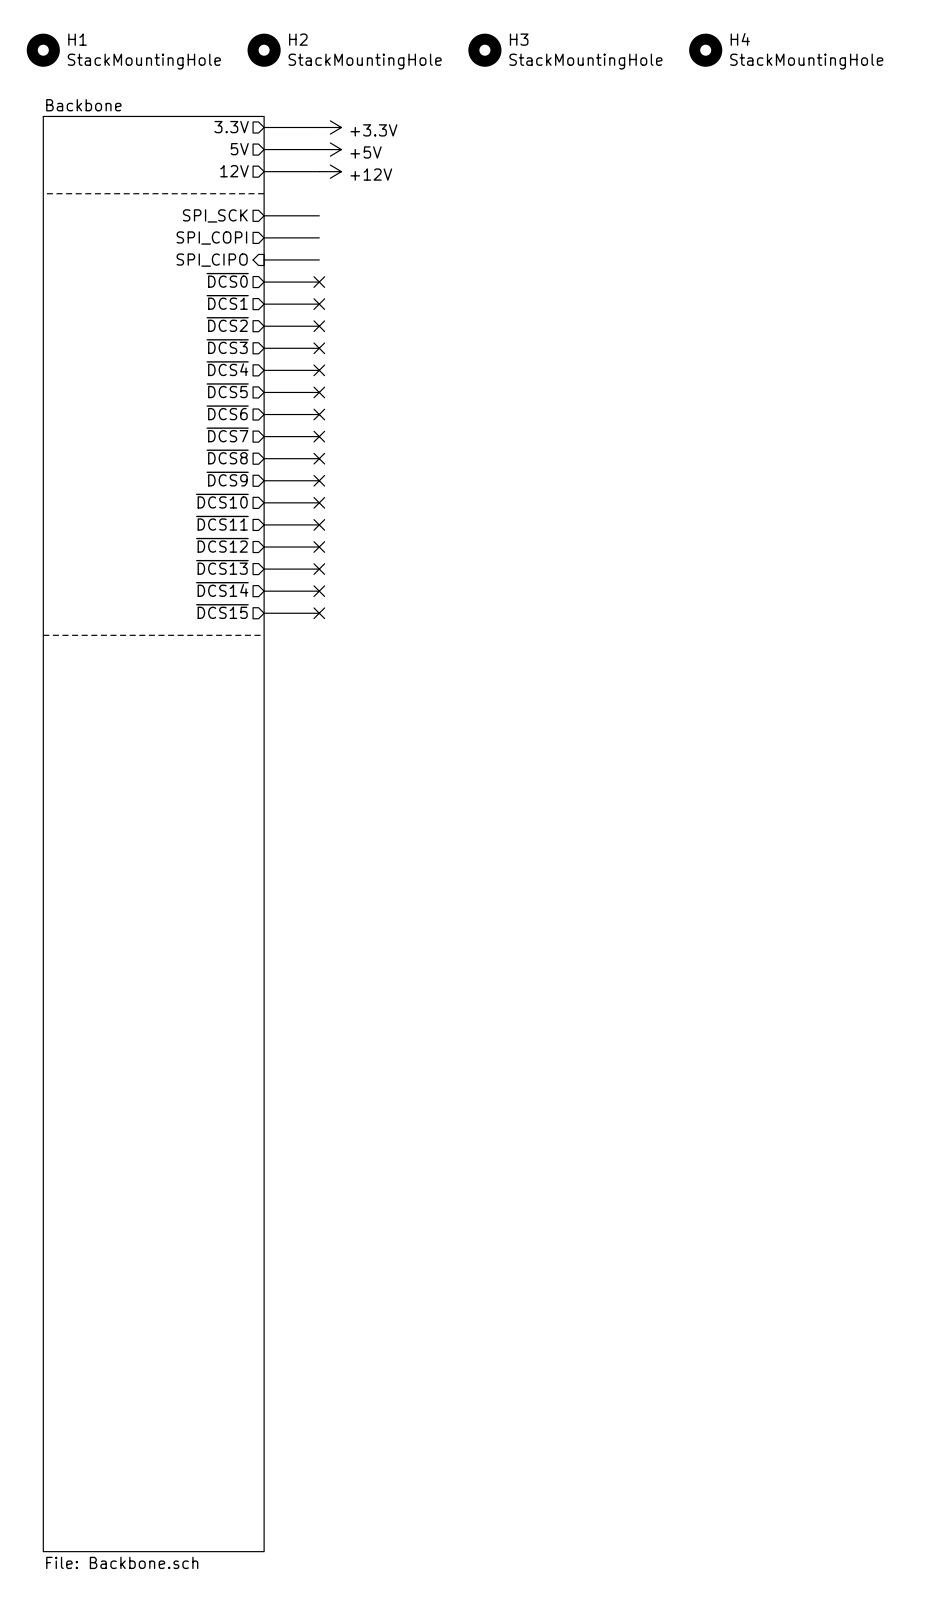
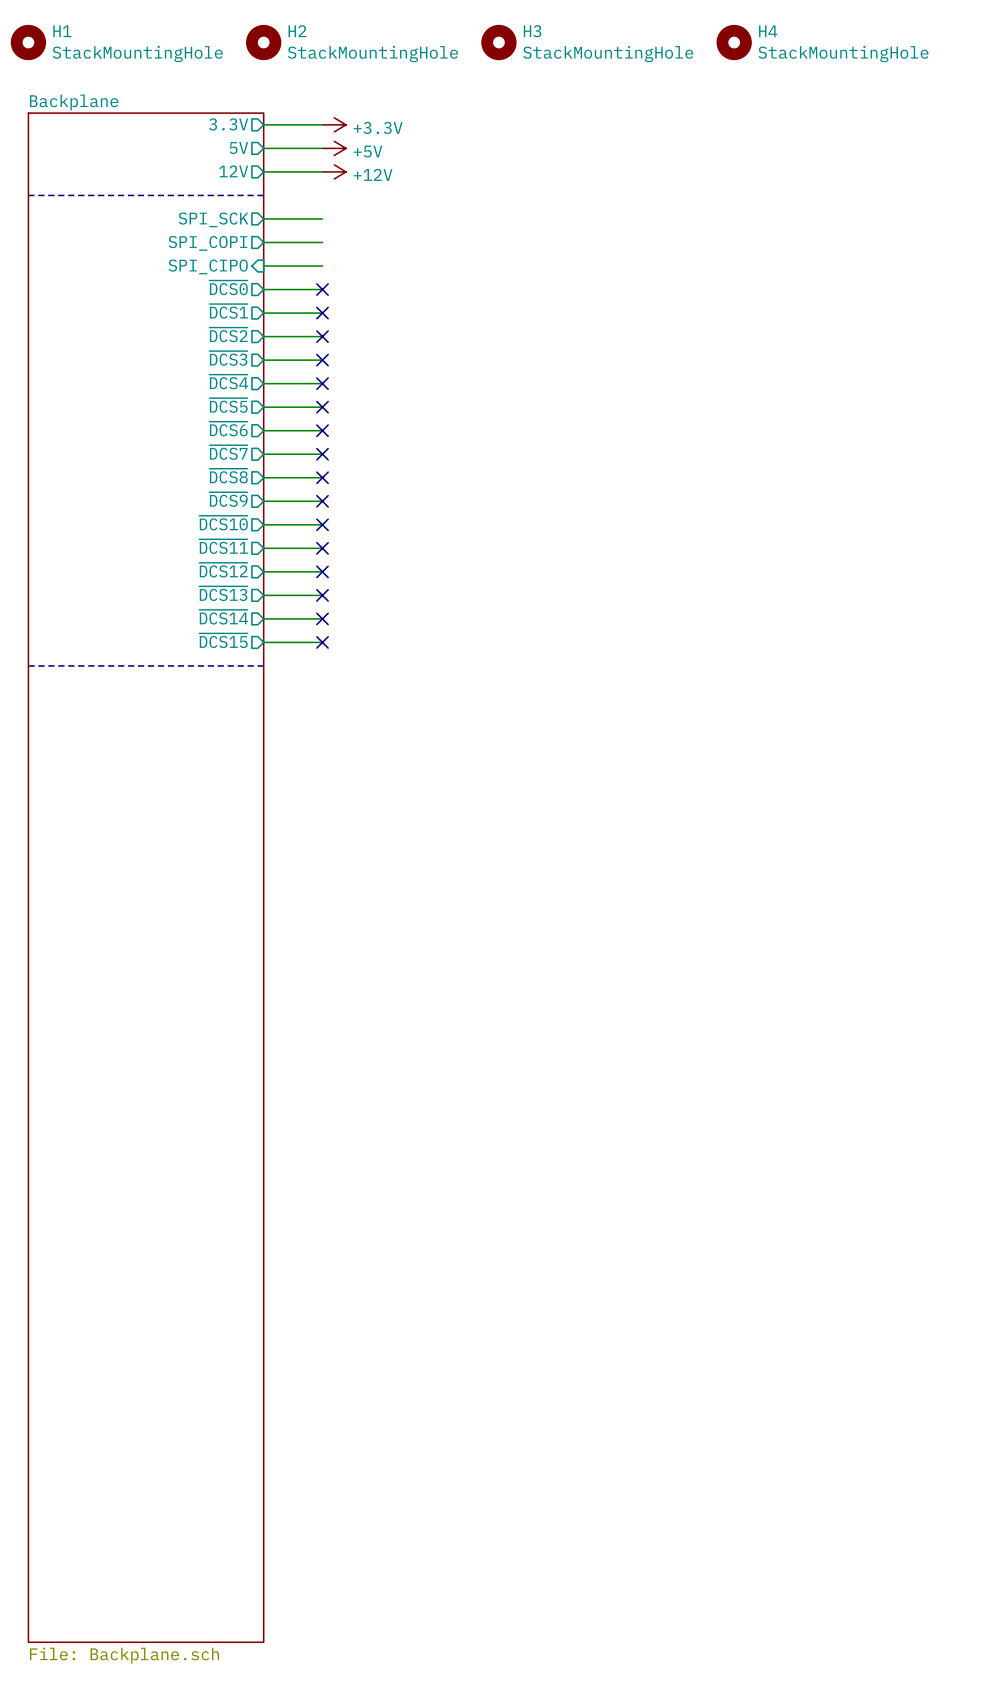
sheet Backbone name: Backbone (83, 105) -> Backplane (74, 102)
sheet Backbone value: File: Backbone.sch (122, 1562) -> File: Backplane.sch (124, 1655)

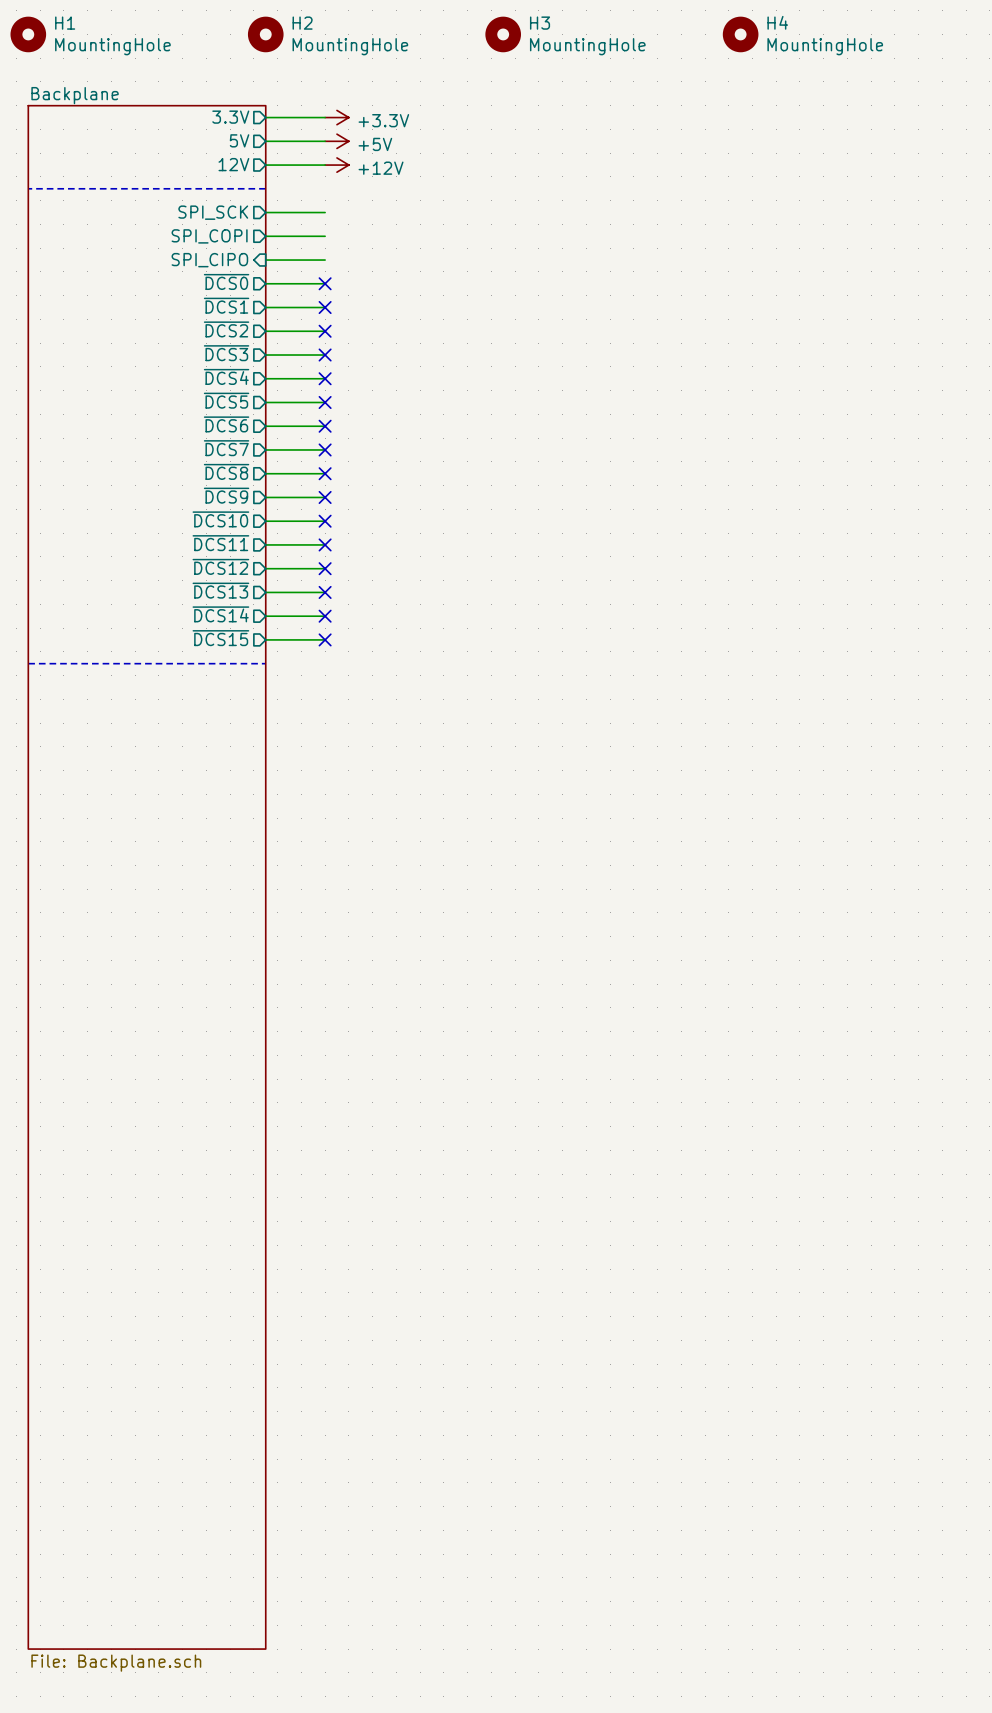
H1 value: StackMountingHole (137, 54) -> MountingHole (112, 46)
H2 value: StackMountingHole (372, 54) -> MountingHole (350, 46)
H3 value: StackMountingHole (608, 54) -> MountingHole (587, 46)
H4 value: StackMountingHole (843, 54) -> MountingHole (825, 46)

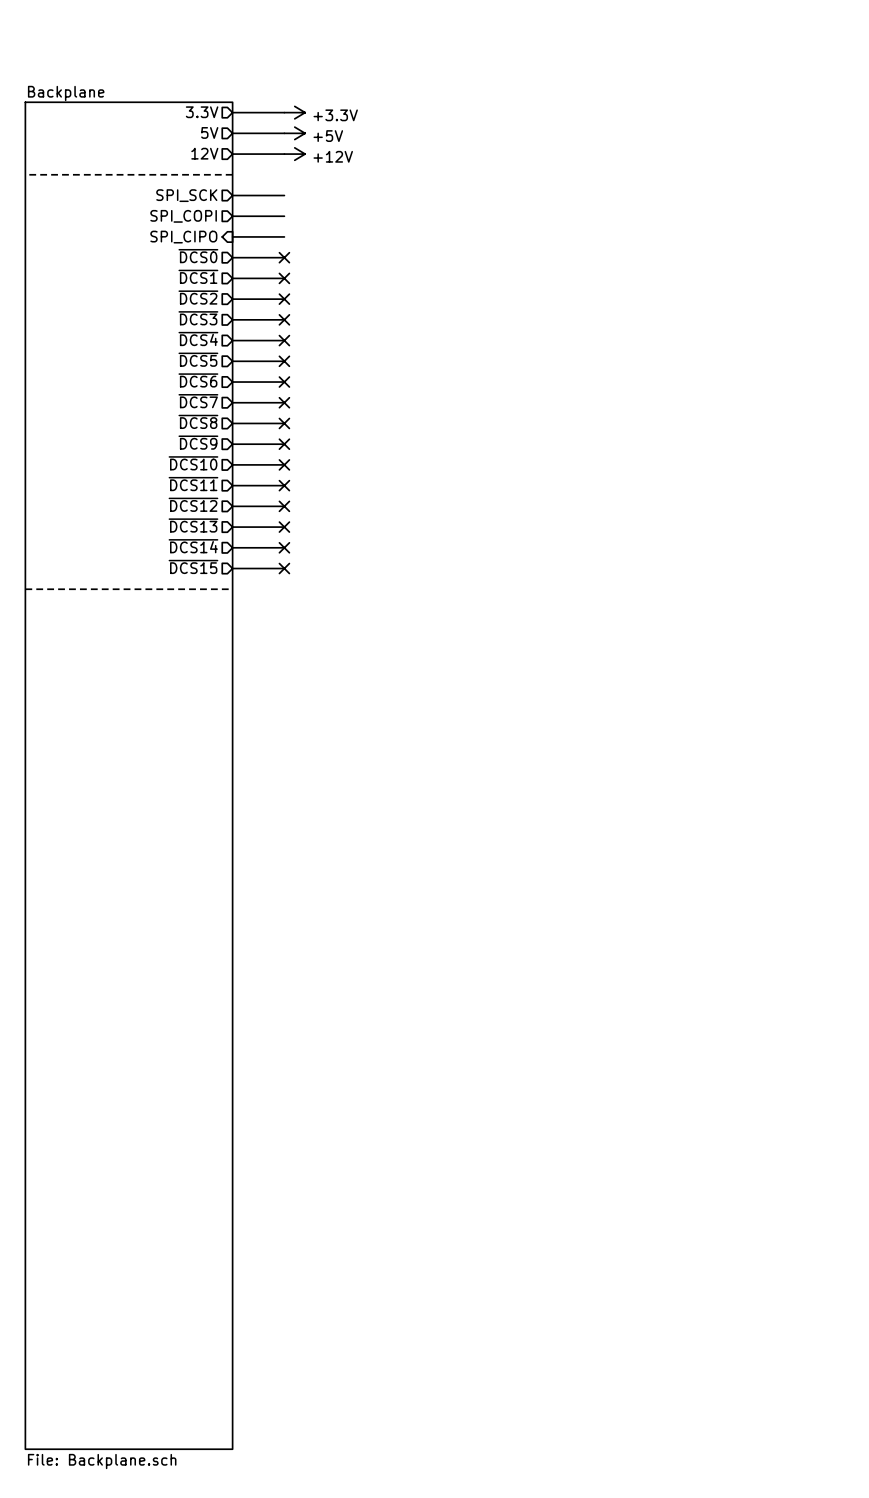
H1: MountingHole (28, 34) -> none
H2: MountingHole (265, 34) -> none
H3: MountingHole (503, 34) -> none
H4: MountingHole (740, 34) -> none

